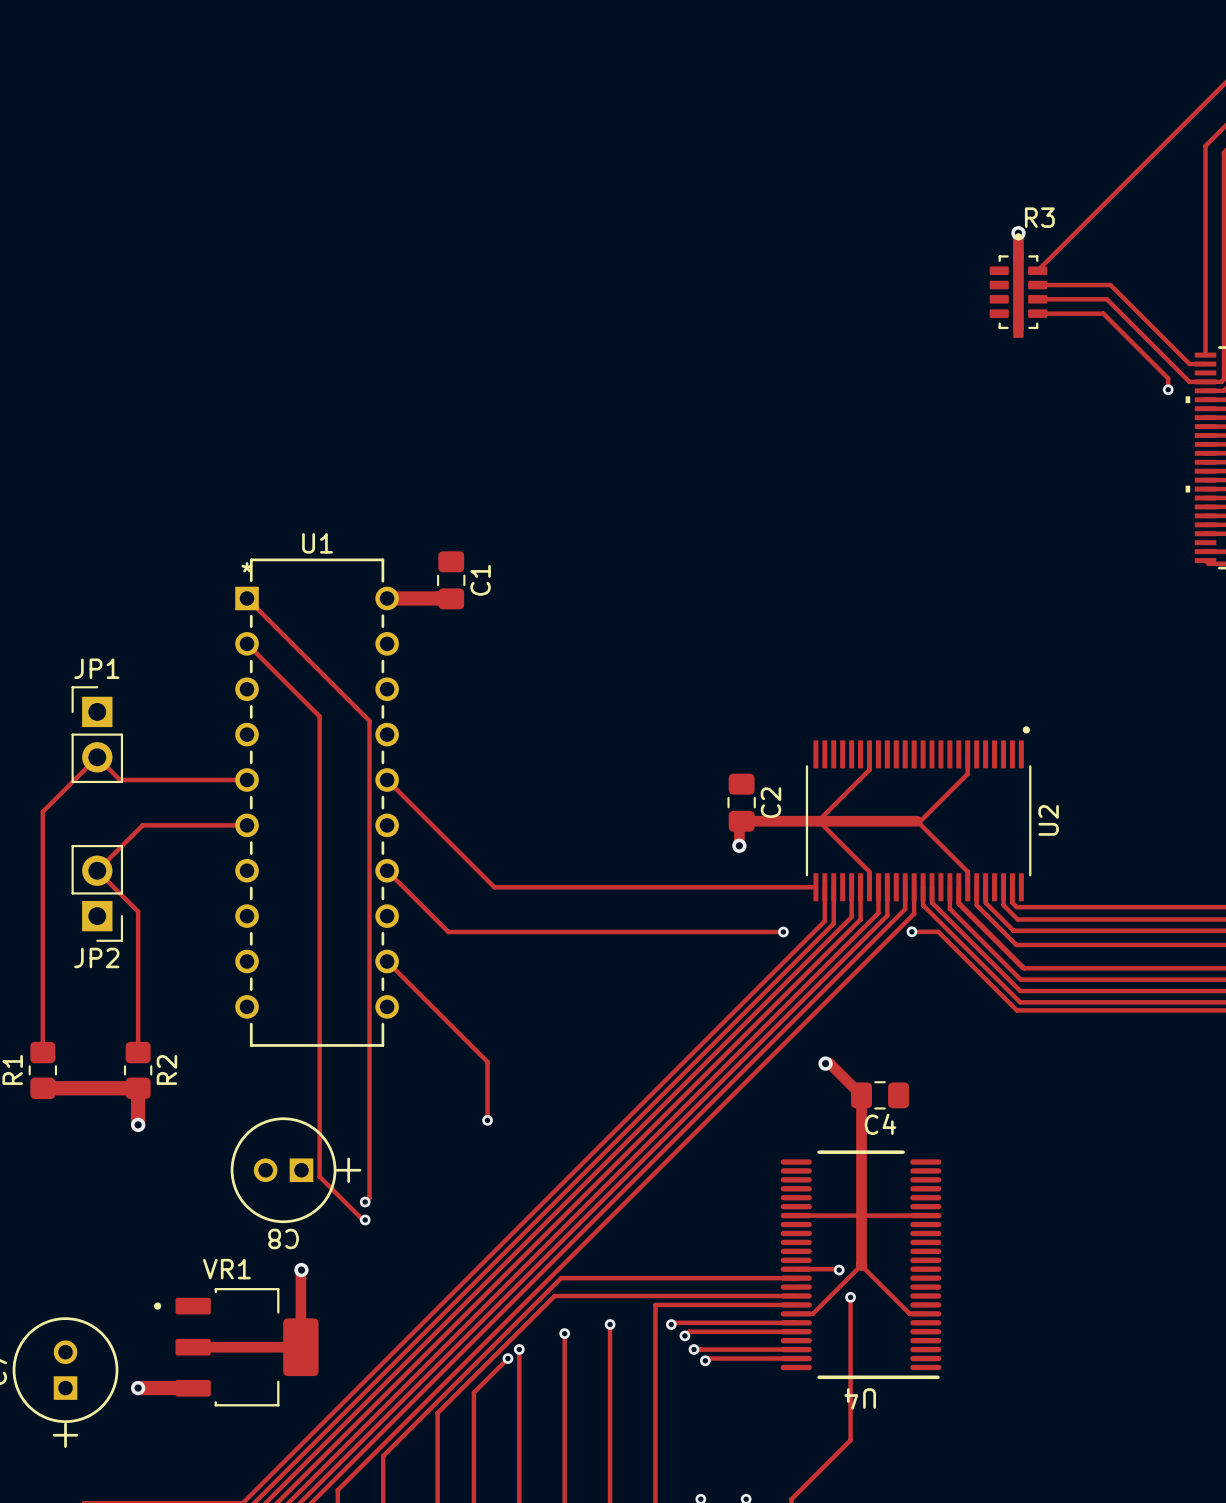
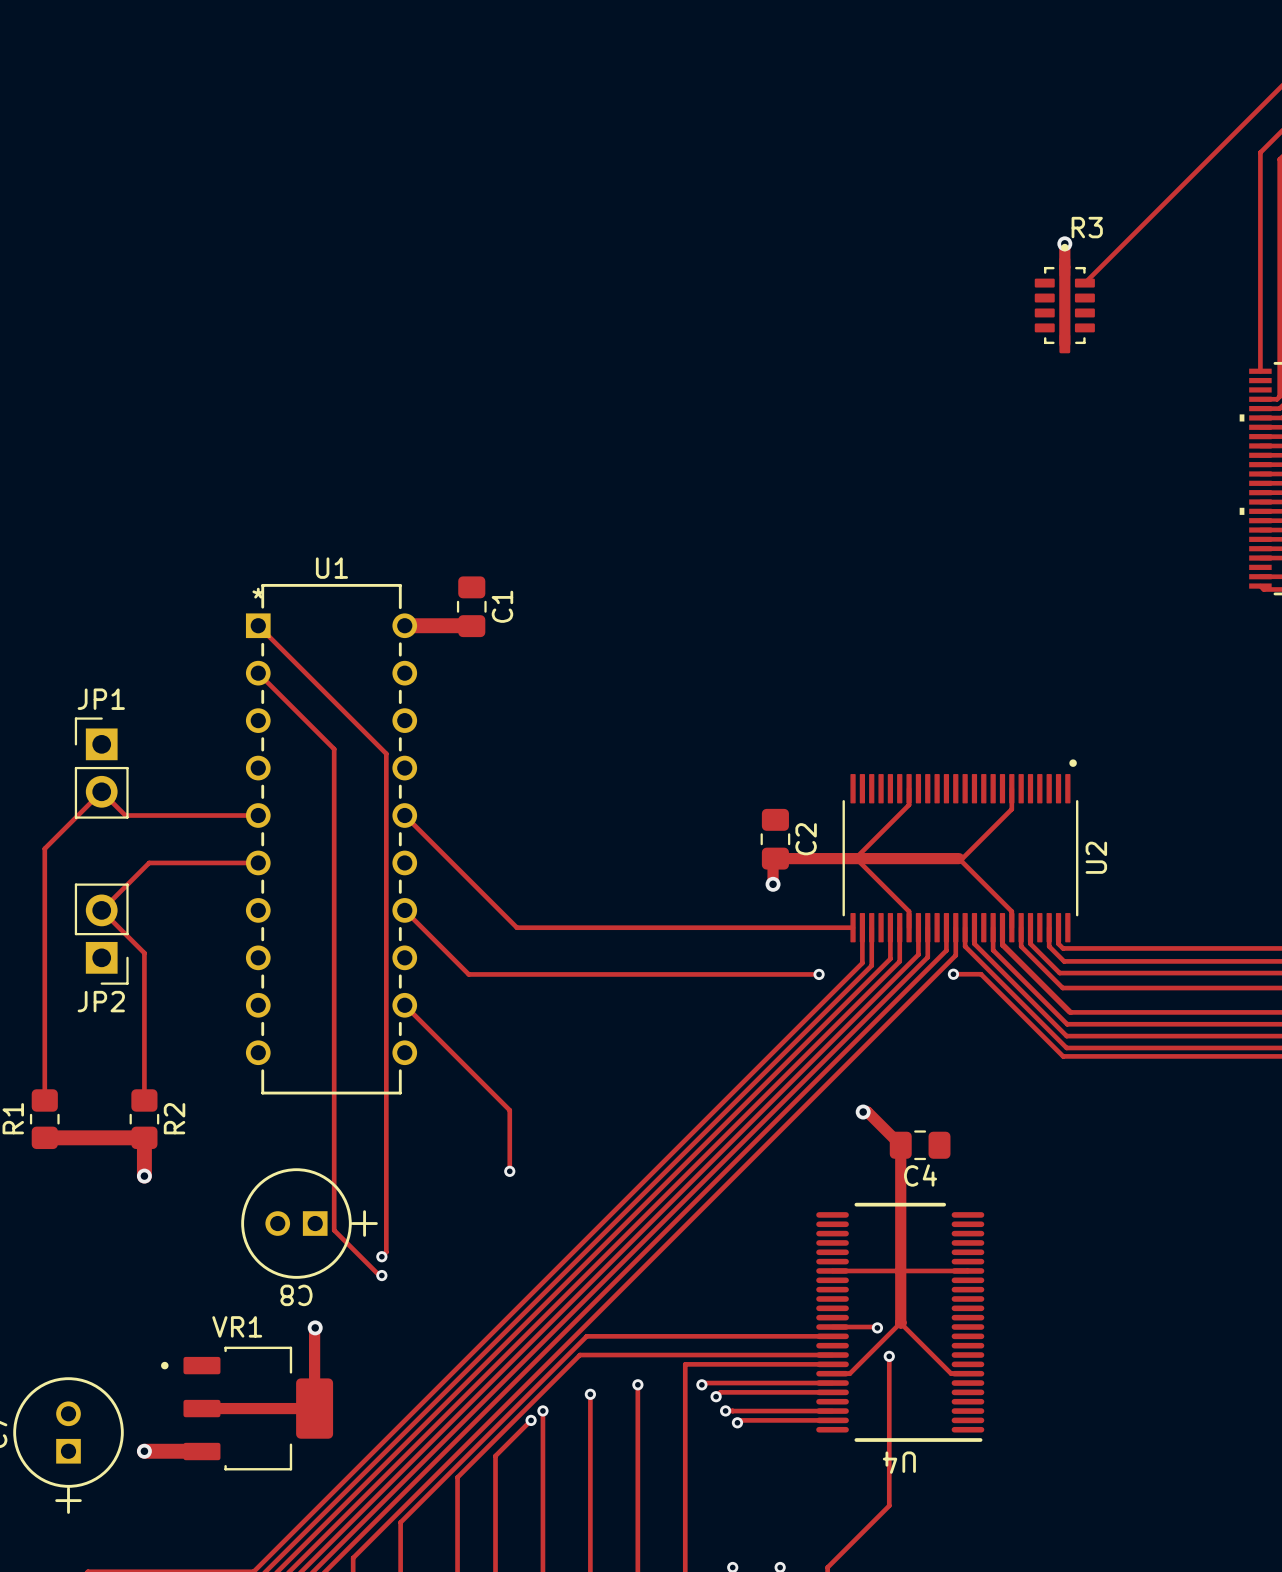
track: (1037, 285) (1110, 285) (1189, 364) (1205, 364) -> none
track: (1037, 299) (1106, 299) (1189, 381) (1205, 381) -> none
track: (1037, 313) (1103, 313) (1168, 378) (1168, 389) -> none
via: (1168, 389) -> none

